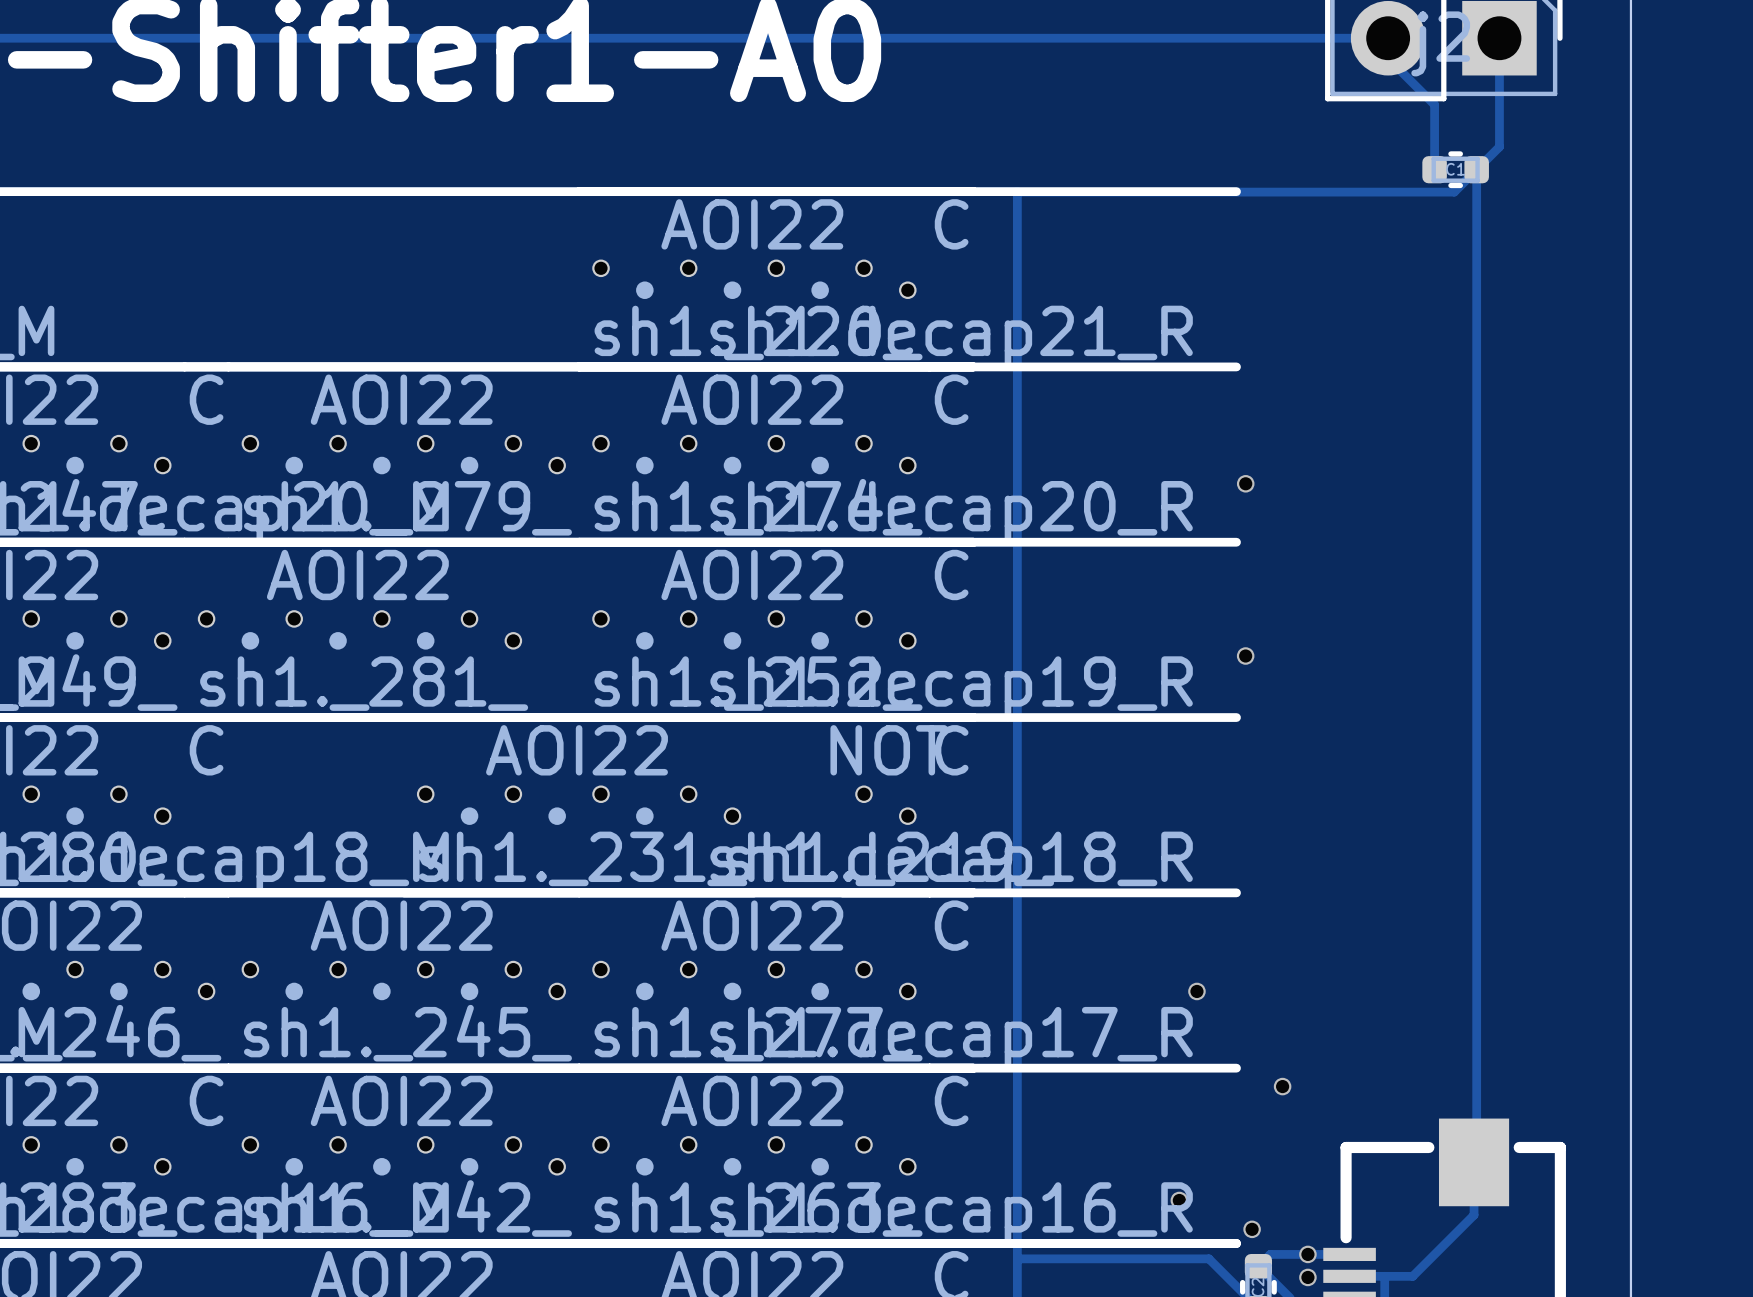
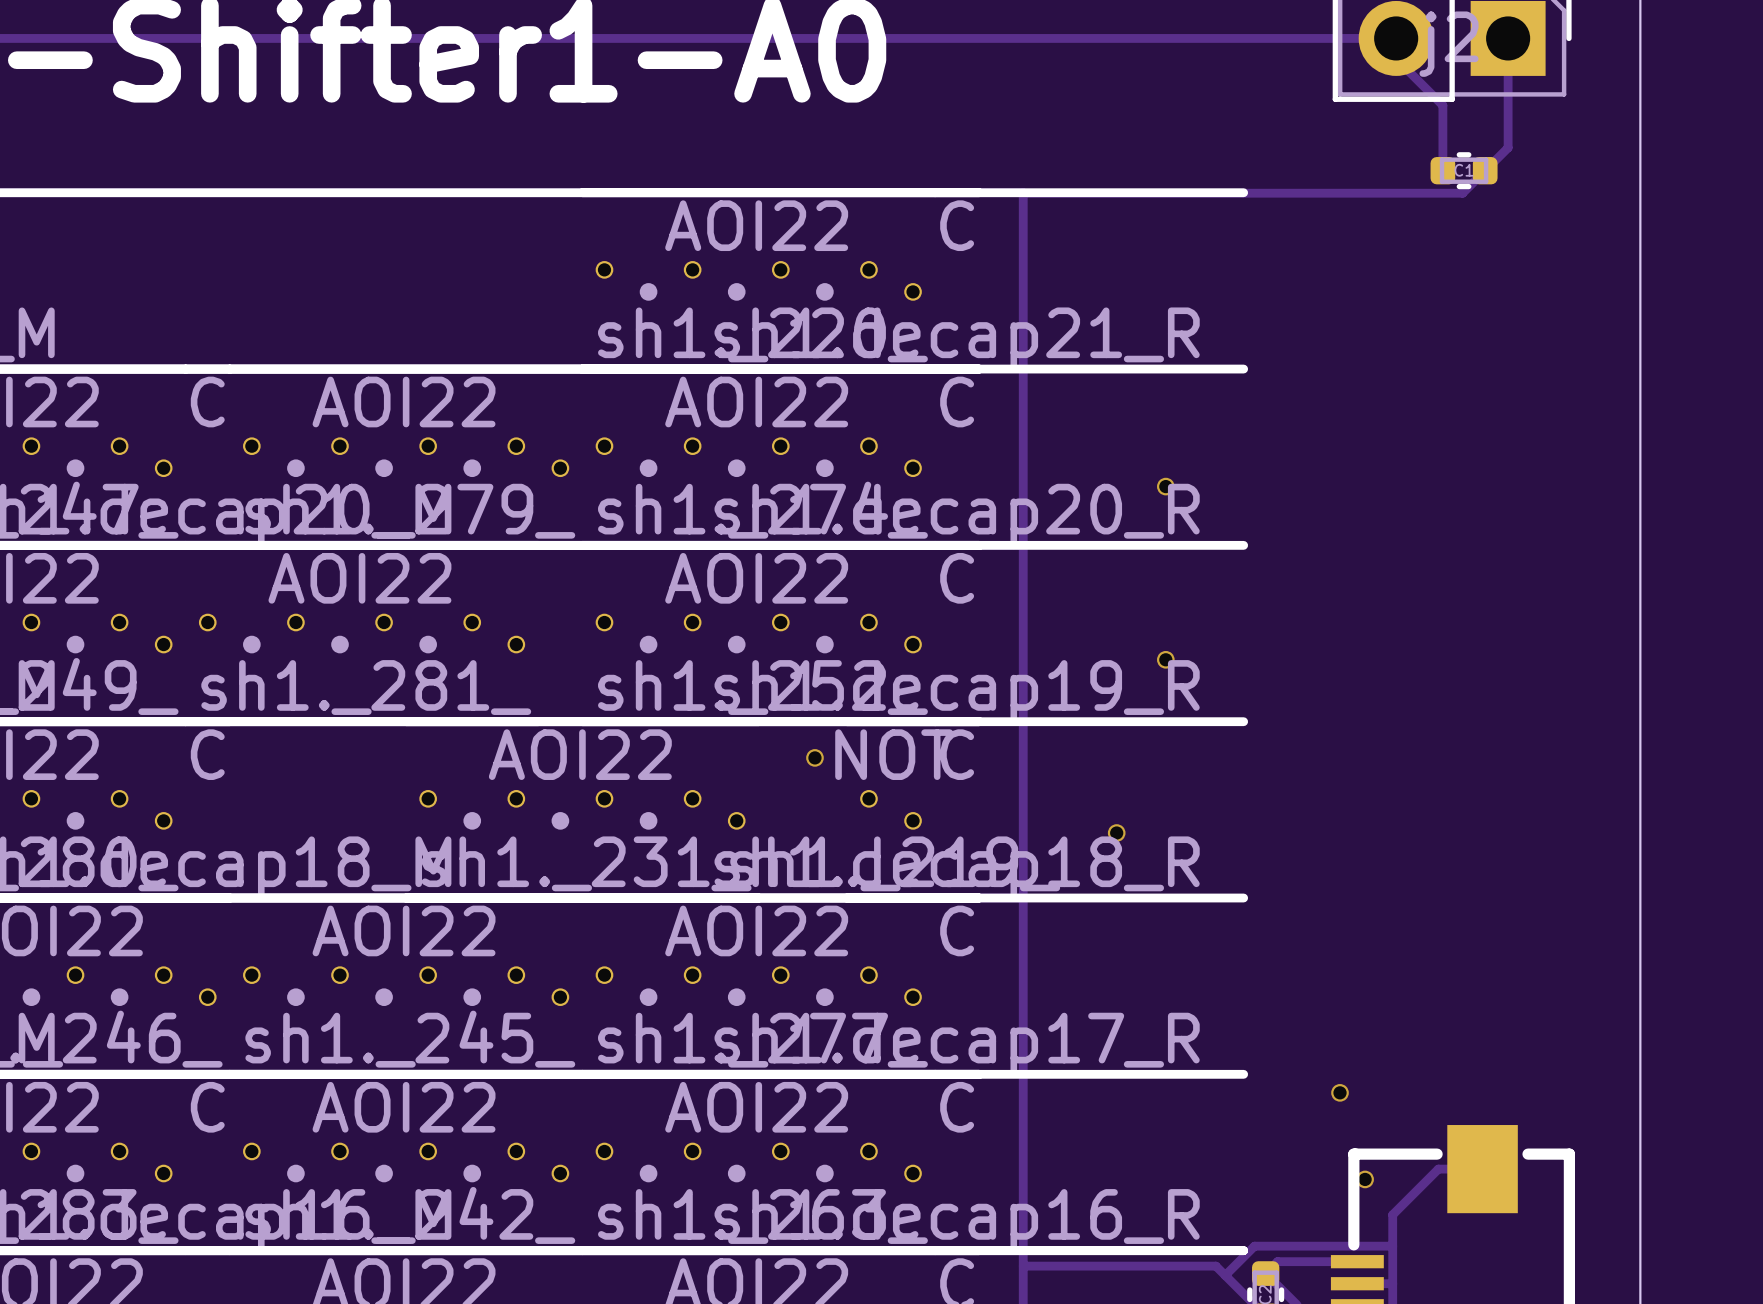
track: (1476, 169) (1476, 1159) -> none
via position: (1245, 483) -> (1165, 486)
via position: (1245, 656) -> (1165, 659)
via: none -> (814, 757)
via: none -> (1116, 833)
via: (1196, 991) -> none
via position: (1282, 1086) -> (1340, 1092)
track: (1474, 1162) (1474, 1215) (1412, 1276) (1384, 1276) -> (1482, 1169) (1438, 1169) (1392, 1214) (1392, 1283)
via: none -> (1365, 1179)
via: (1179, 1200) -> none
via: (1252, 1229) -> none
track: none -> (1392, 1246) (1254, 1246) (1225, 1275)
via: (1307, 1254) -> none
via: (1307, 1277) -> none

